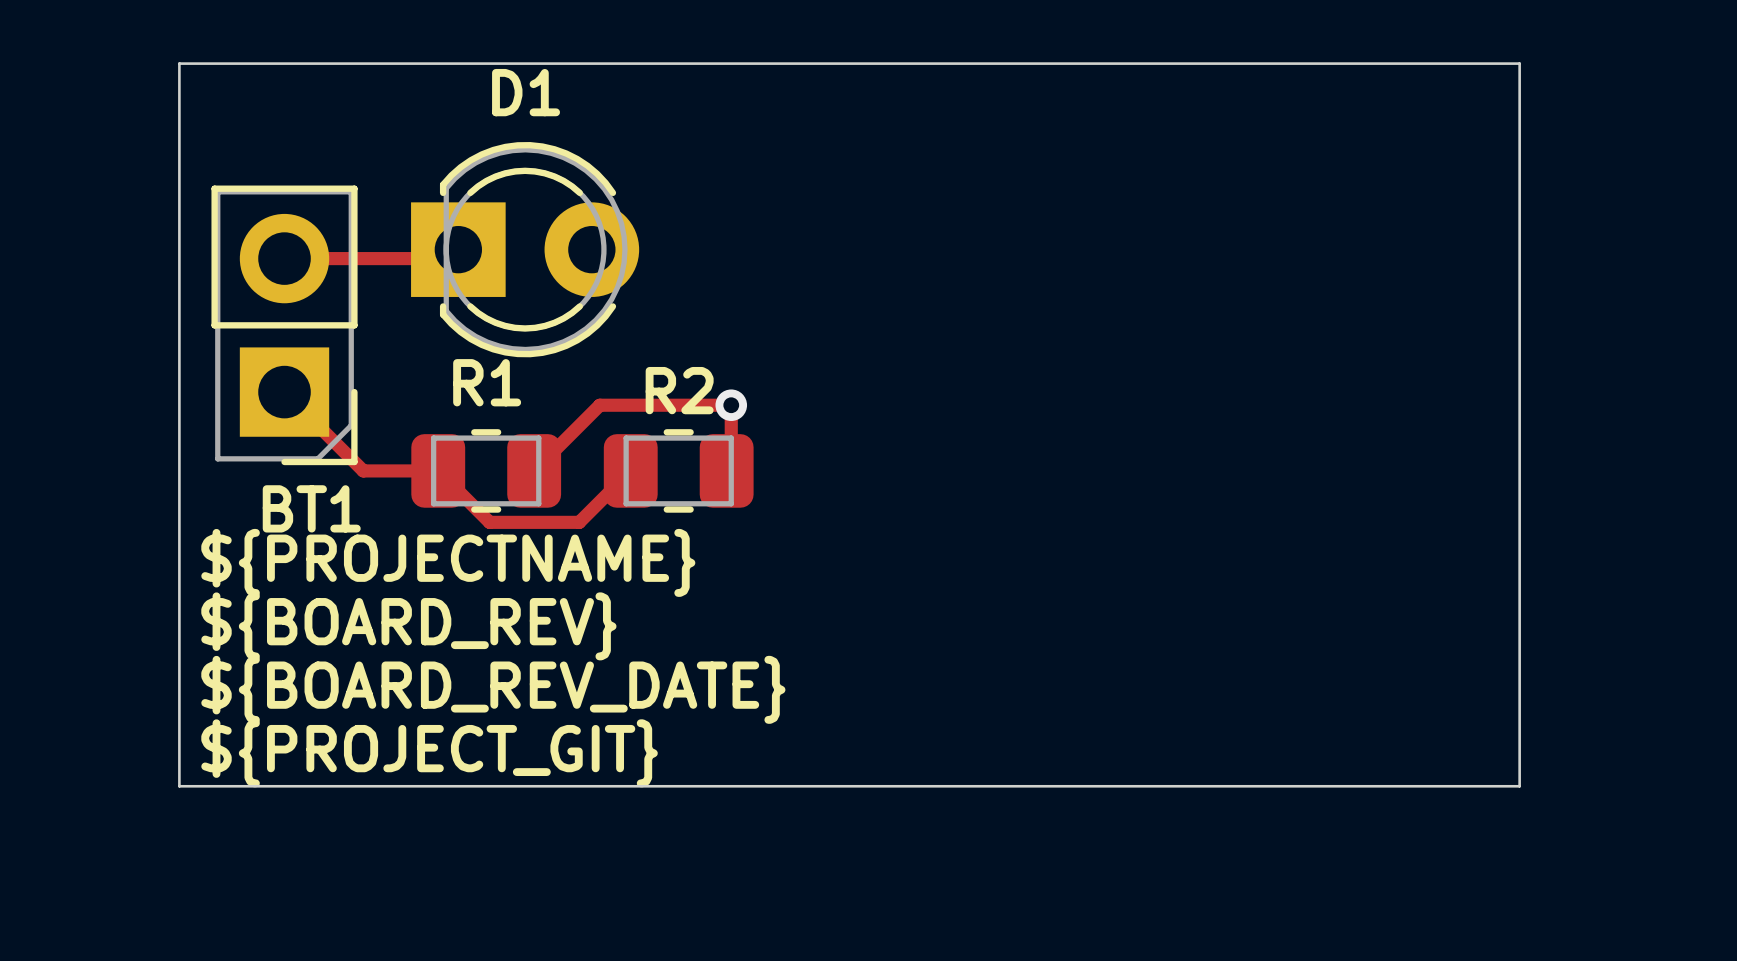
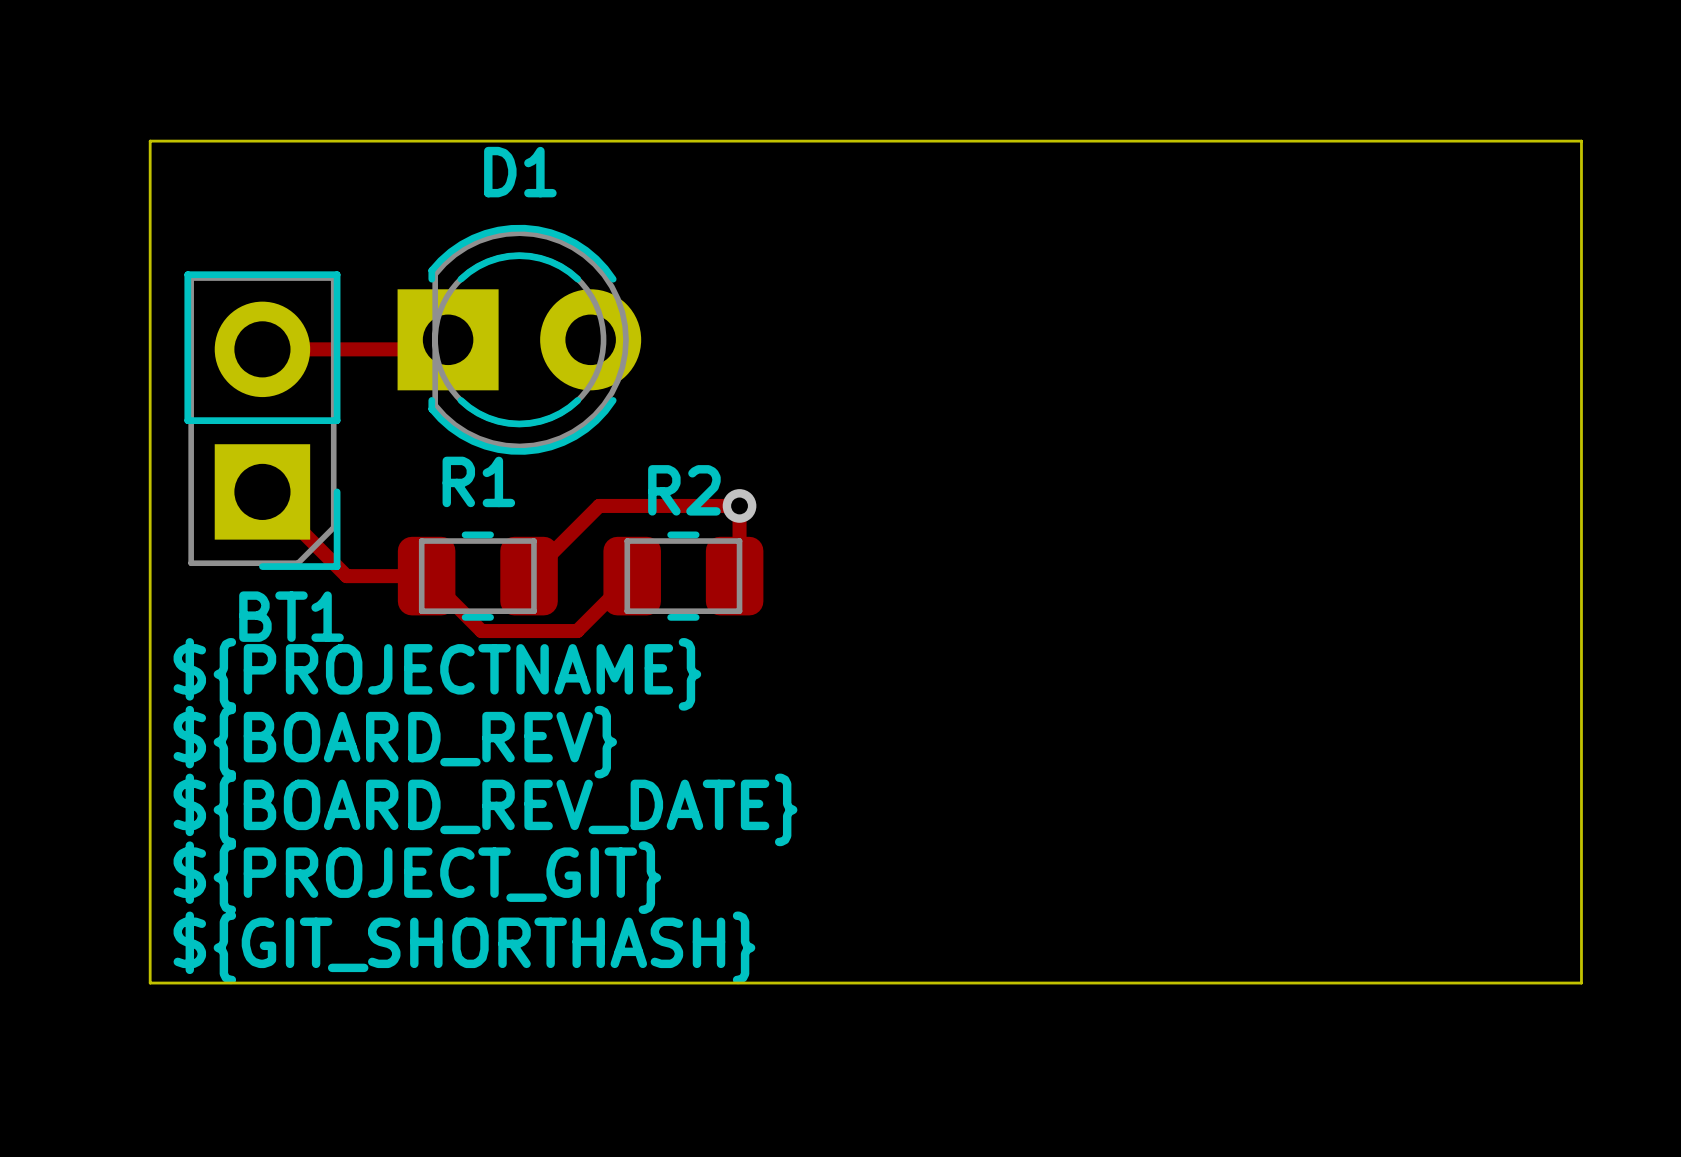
board edge: (179, 786) (1519, 786) -> (150, 912) (150, 983) (1581, 983) (1581, 912)
text: none -> ${GIT_SHORTHASH} (464, 947)

